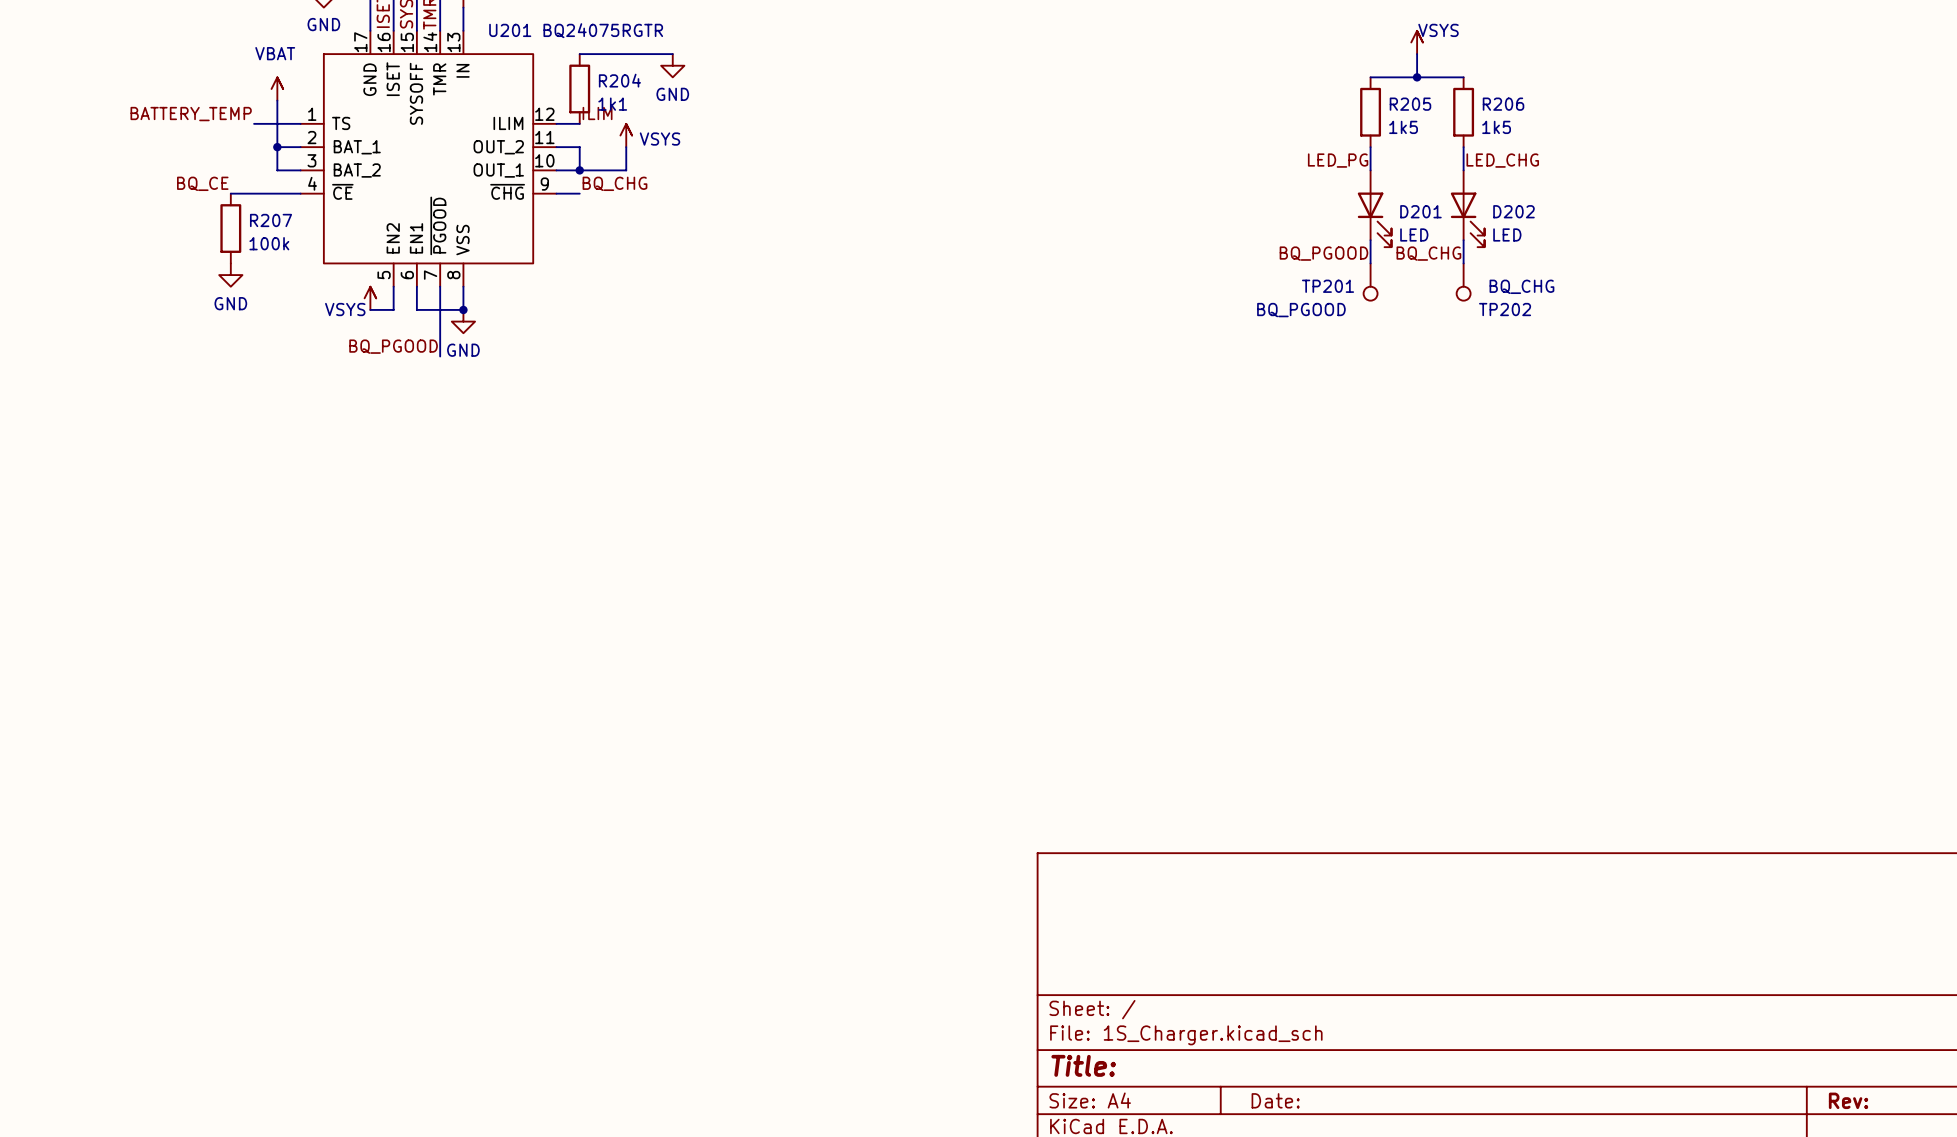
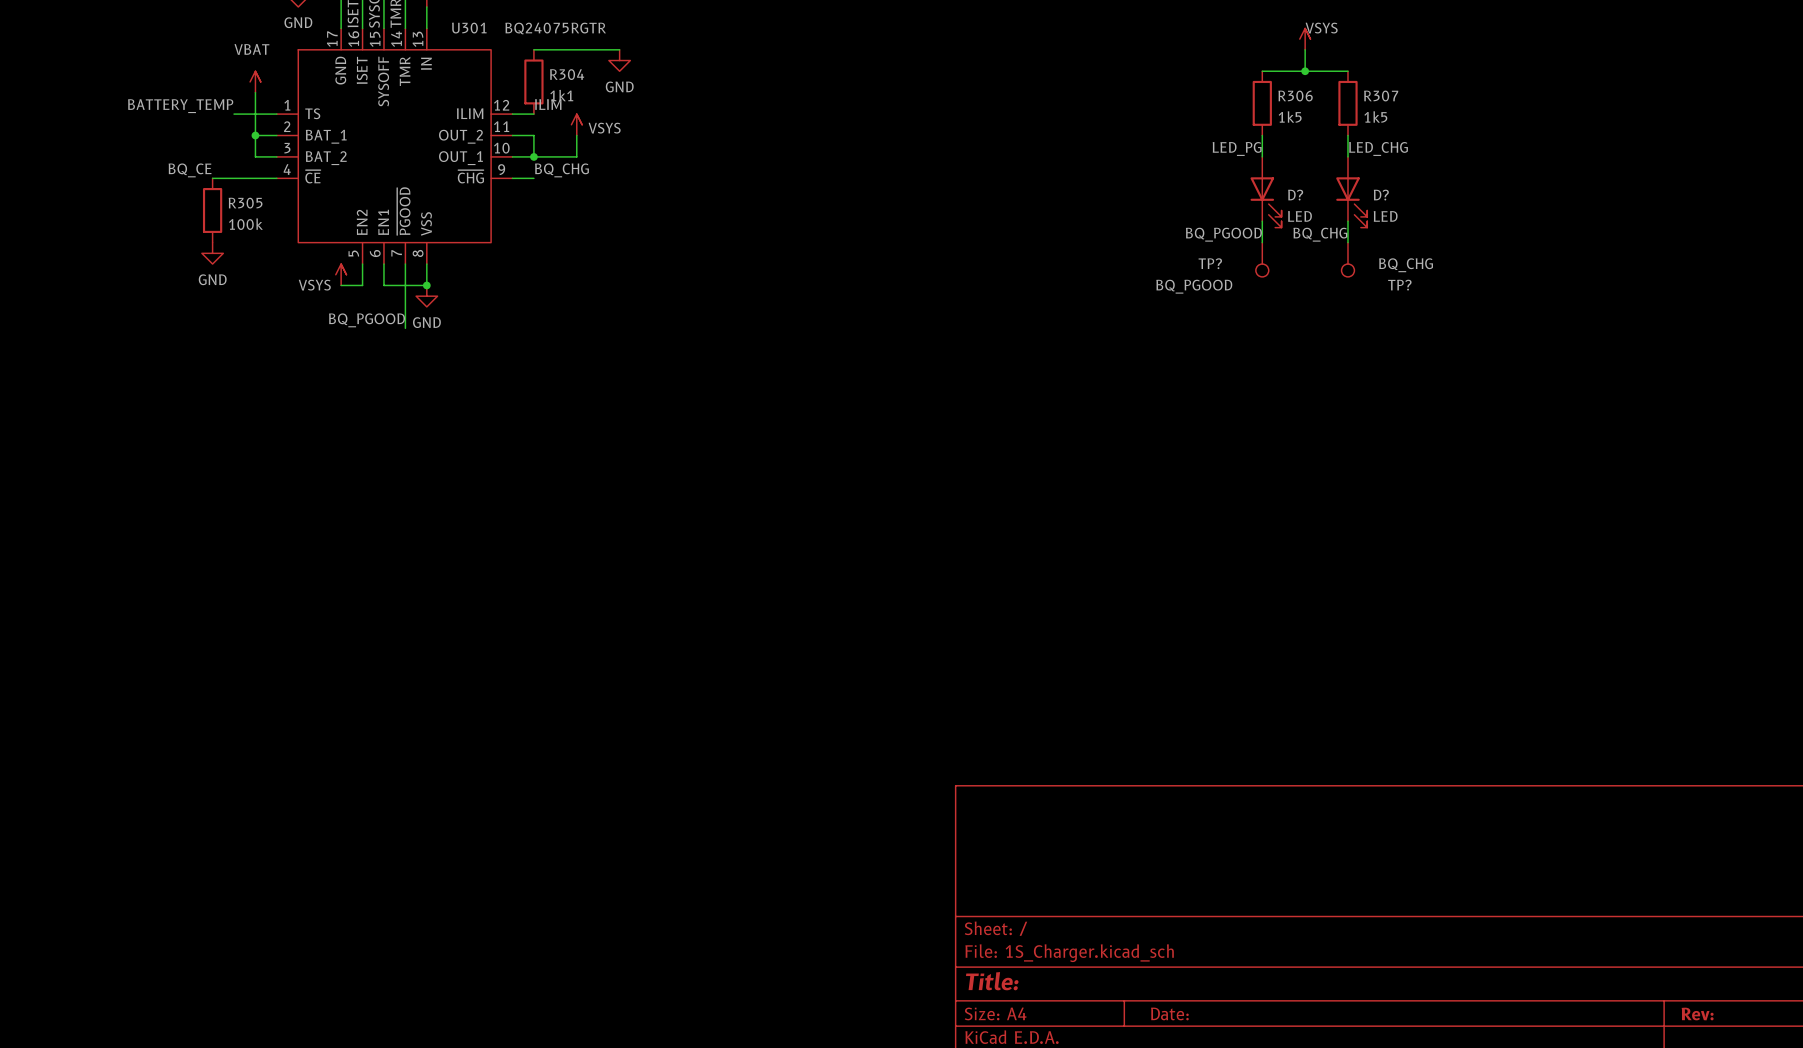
U201 name: U201 (510, 30) -> U301 (469, 28)
R204 name: R204 (619, 80) -> R304 (567, 74)
R205 name: R205 (1410, 104) -> R306 (1295, 96)
R206 name: R206 (1503, 104) -> R307 (1381, 96)
D201 name: D201 (1420, 211) -> D? (1295, 195)
D202 name: D202 (1513, 211) -> D? (1381, 195)
R207 name: R207 (271, 220) -> R305 (245, 203)
TP201 name: TP201 (1328, 286) -> TP? (1210, 263)
TP202 name: TP202 (1505, 309) -> TP? (1399, 285)

